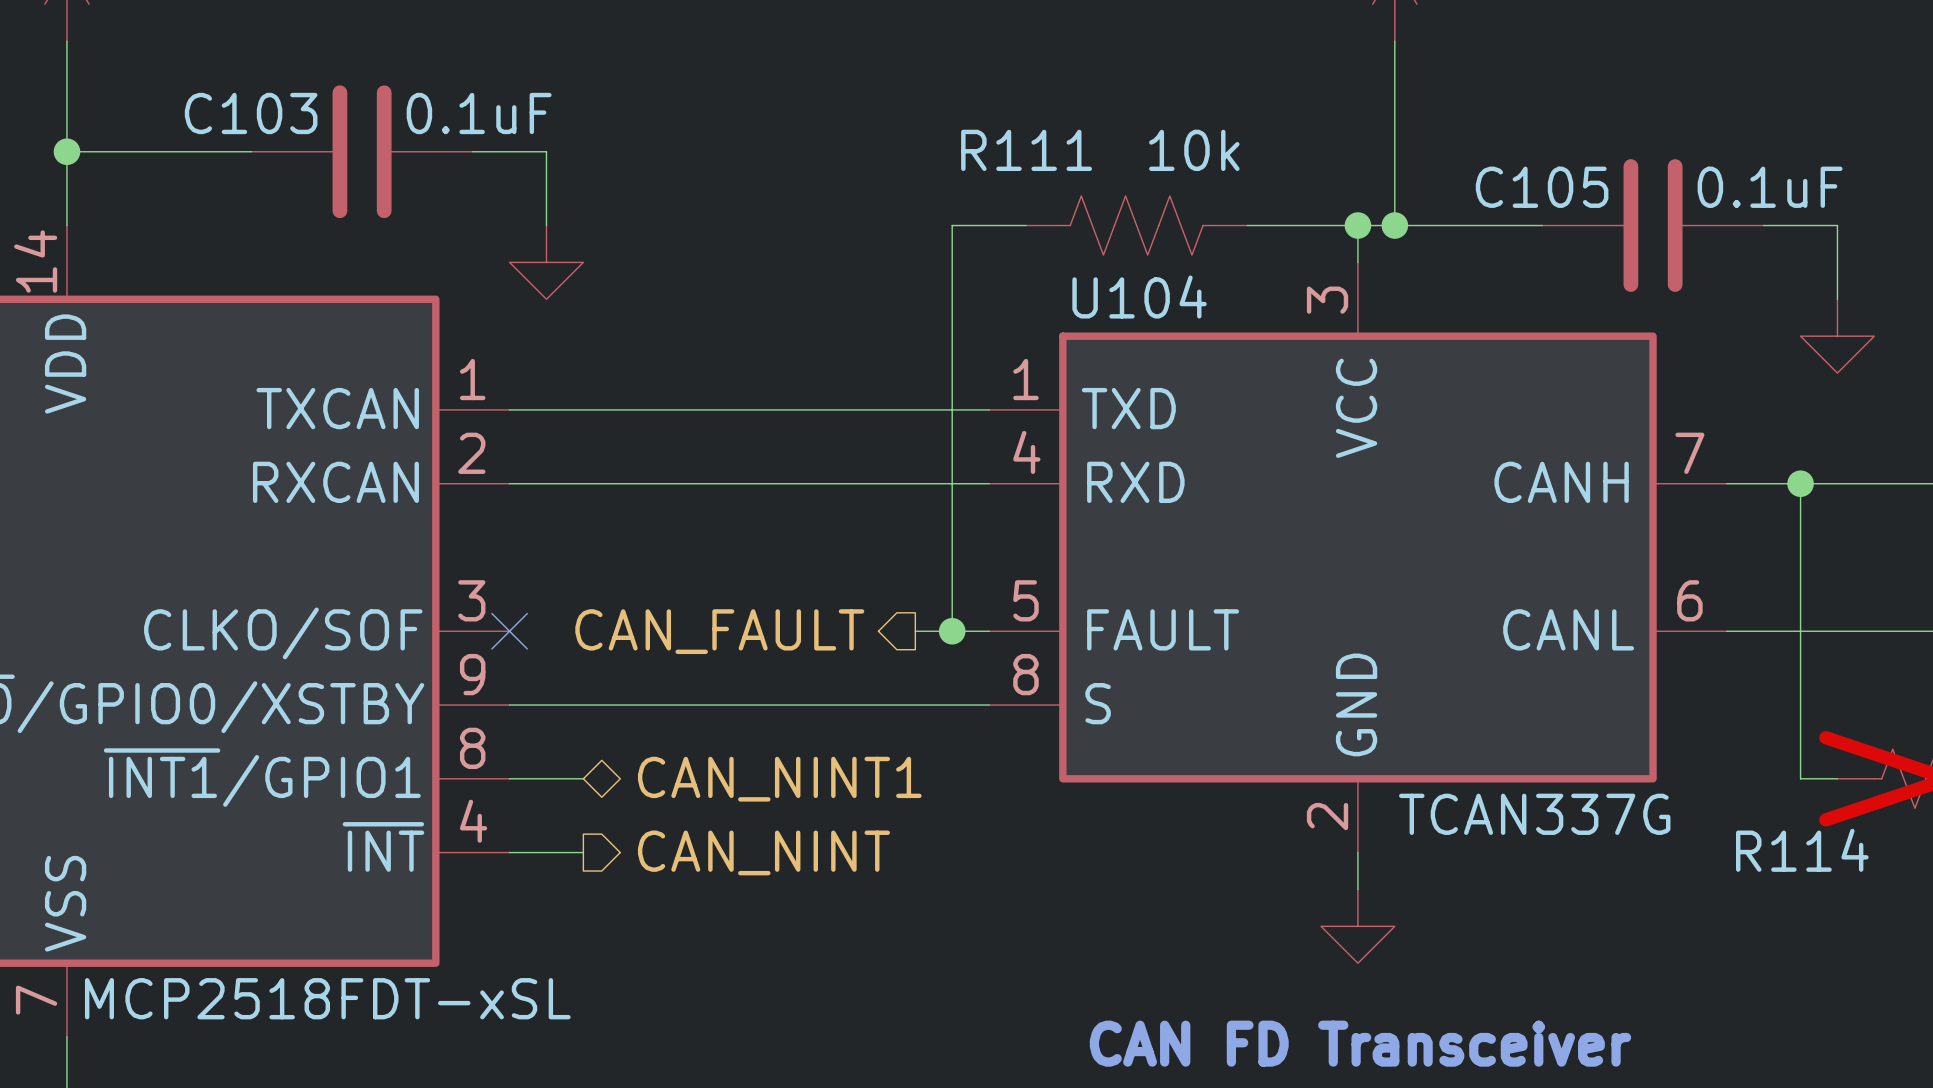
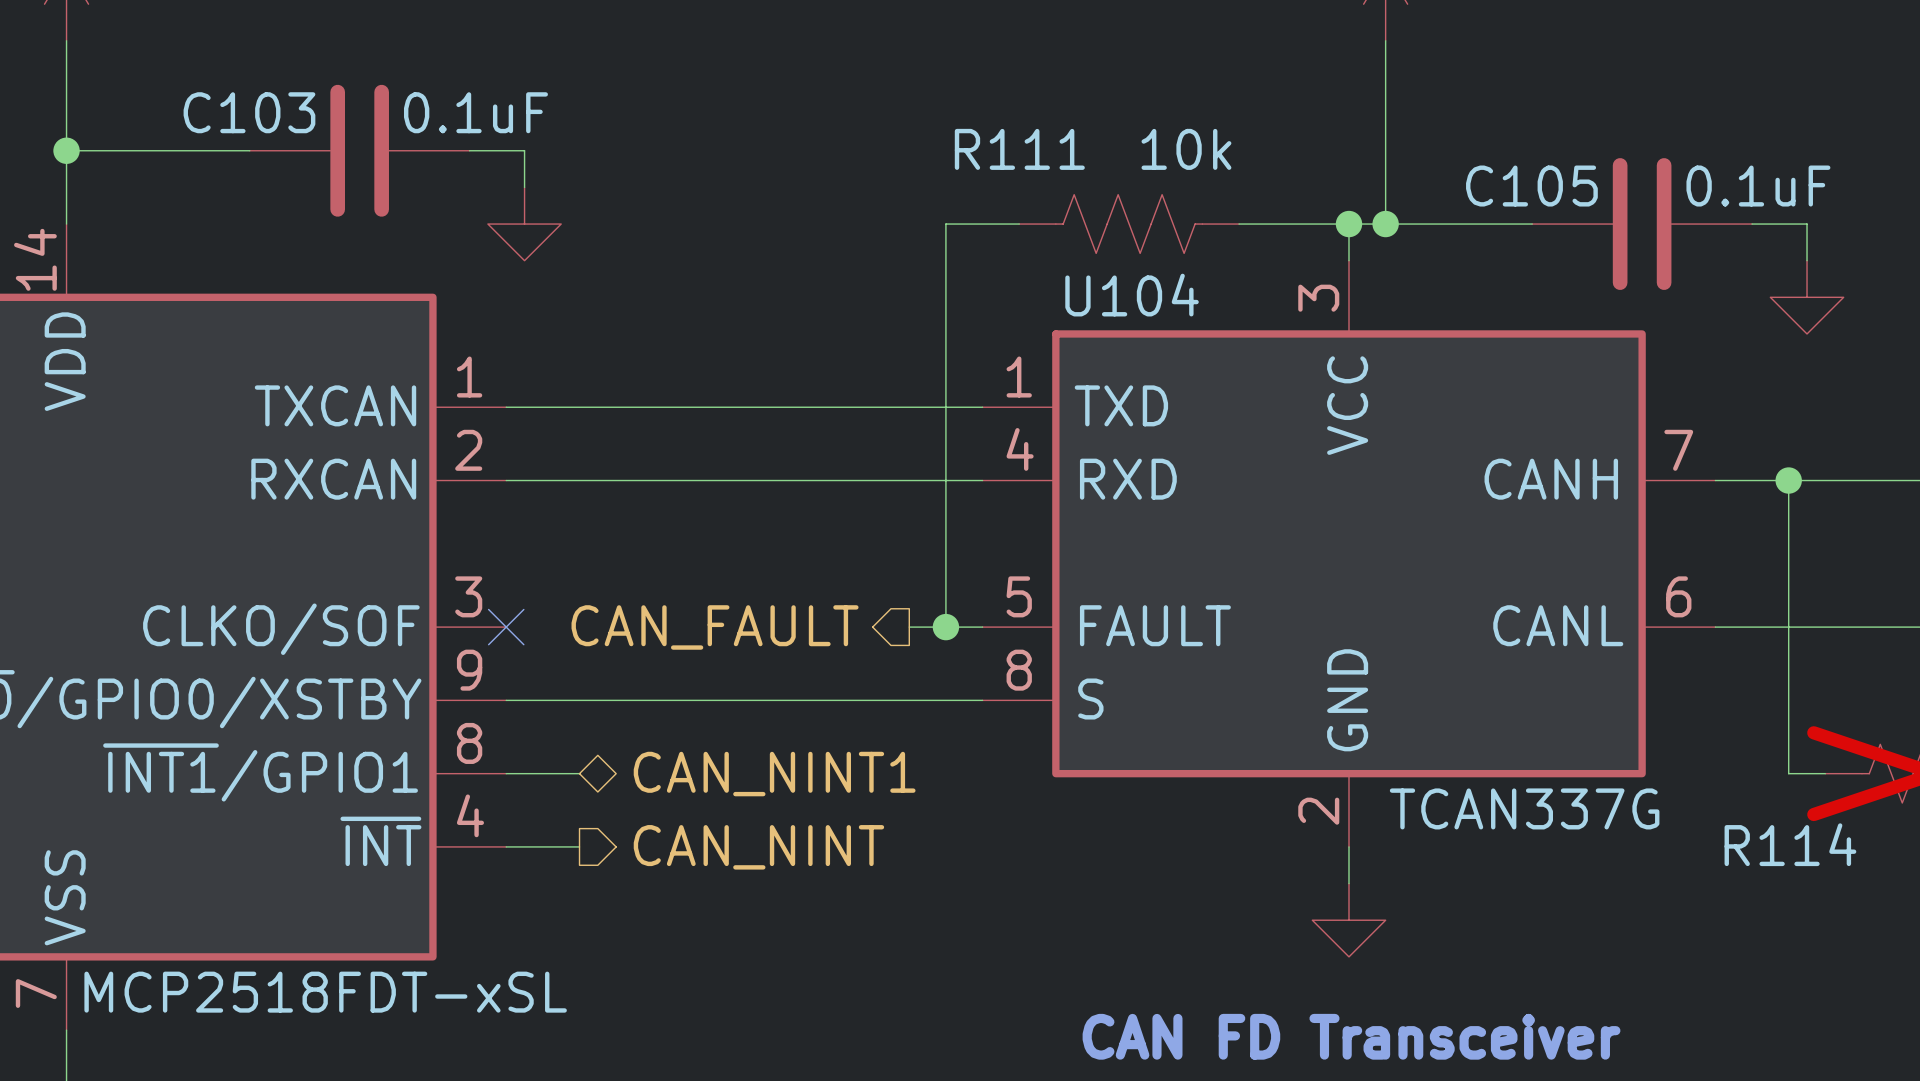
wire: (528, 151) (546, 151) (546, 225) -> (524, 150) (524, 187)
wire: (1819, 225) (1837, 225) (1837, 299) -> (1807, 224) (1807, 260)
power symbol position: (546, 262) -> (524, 224)
power symbol position: (1837, 336) -> (1807, 297)

